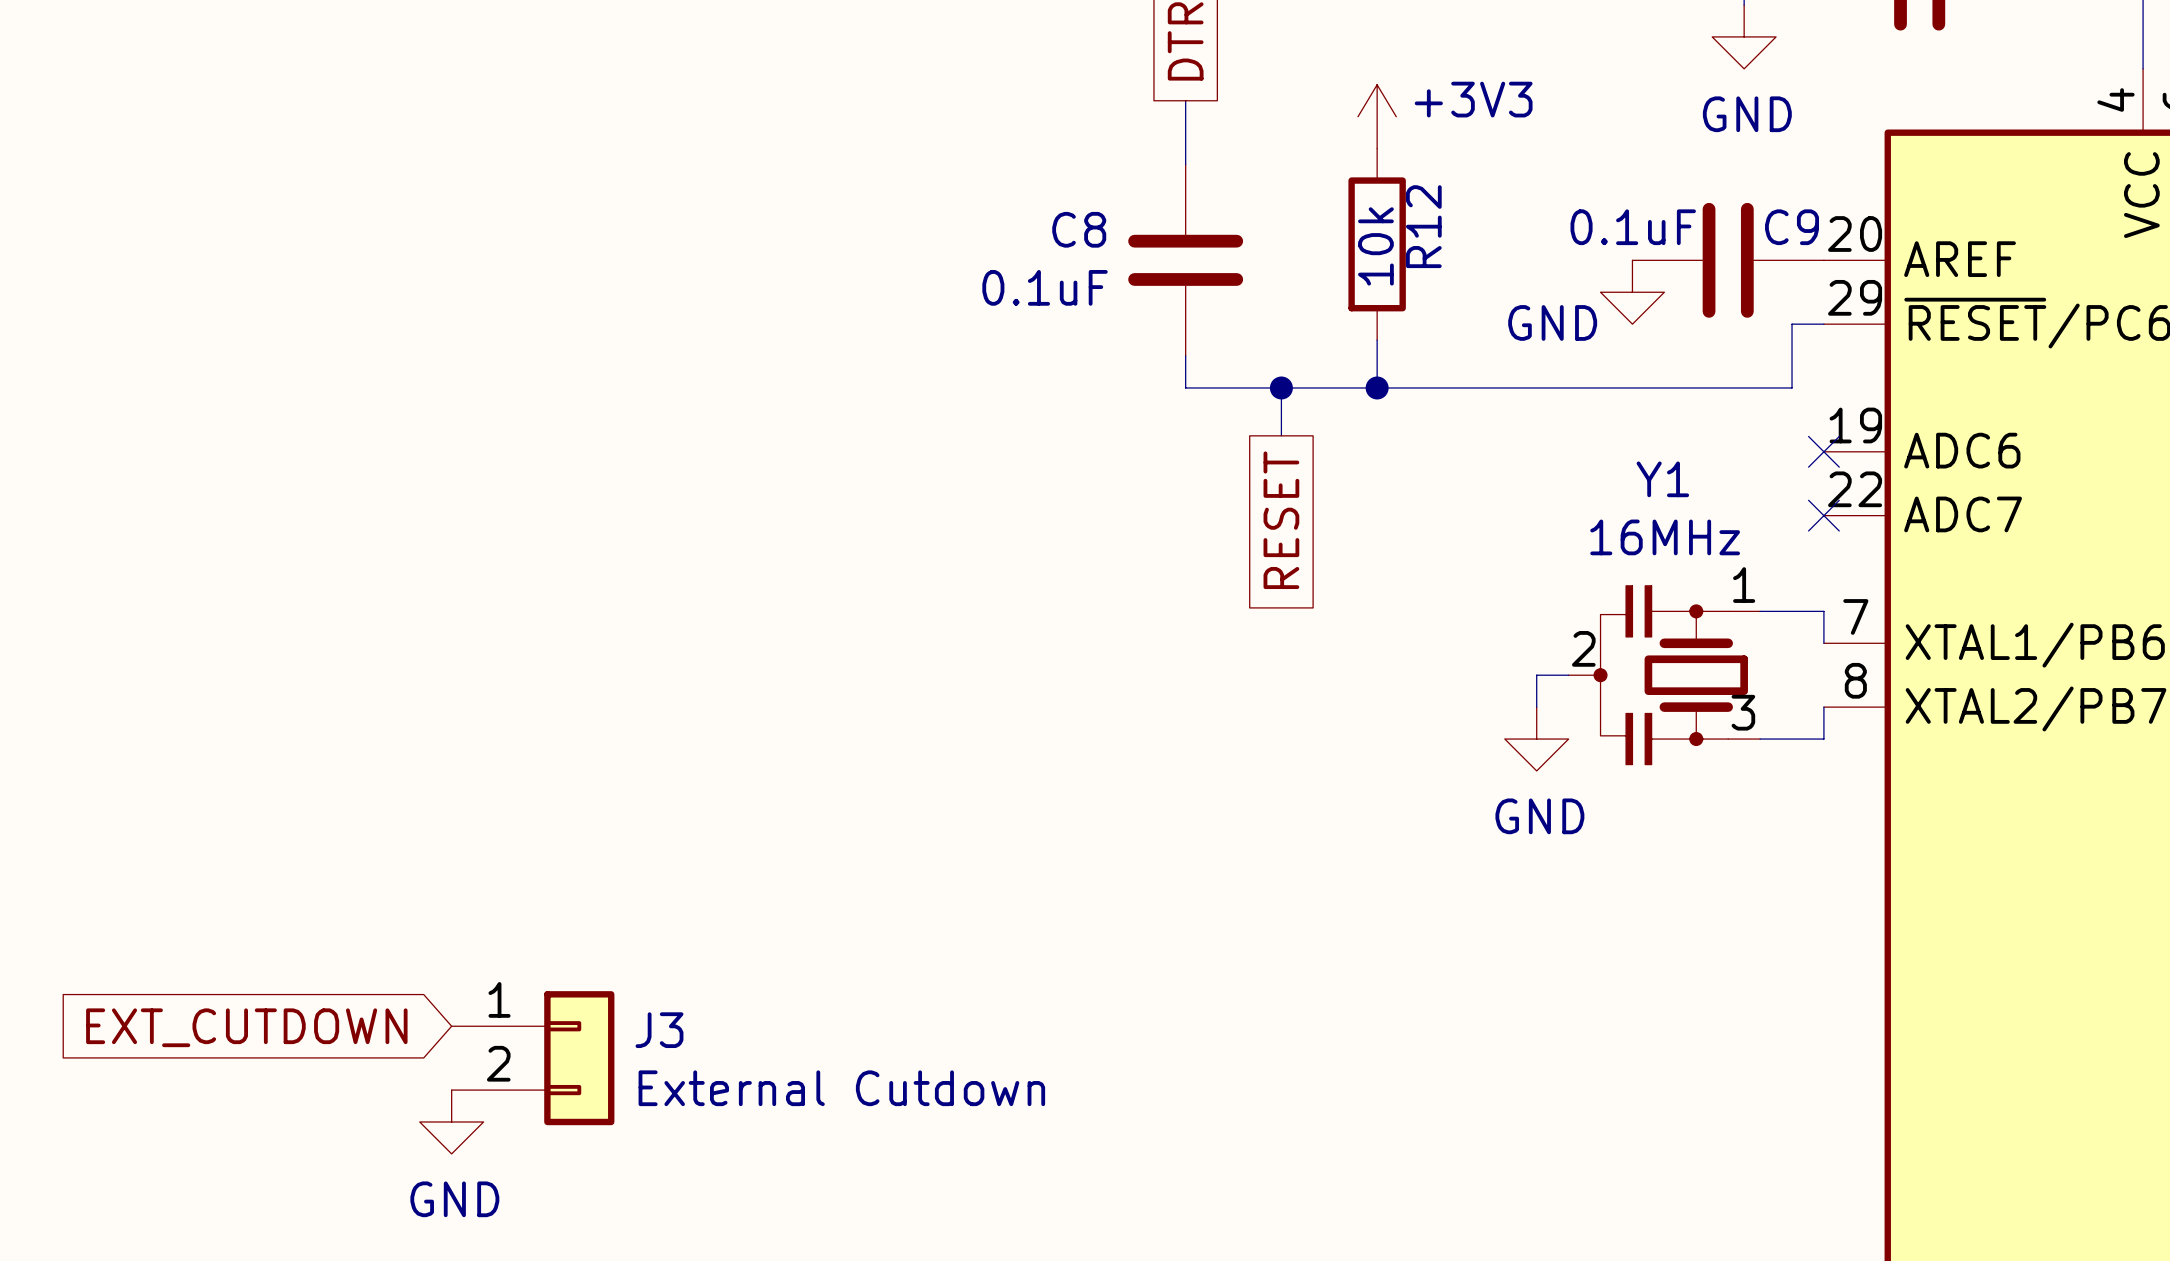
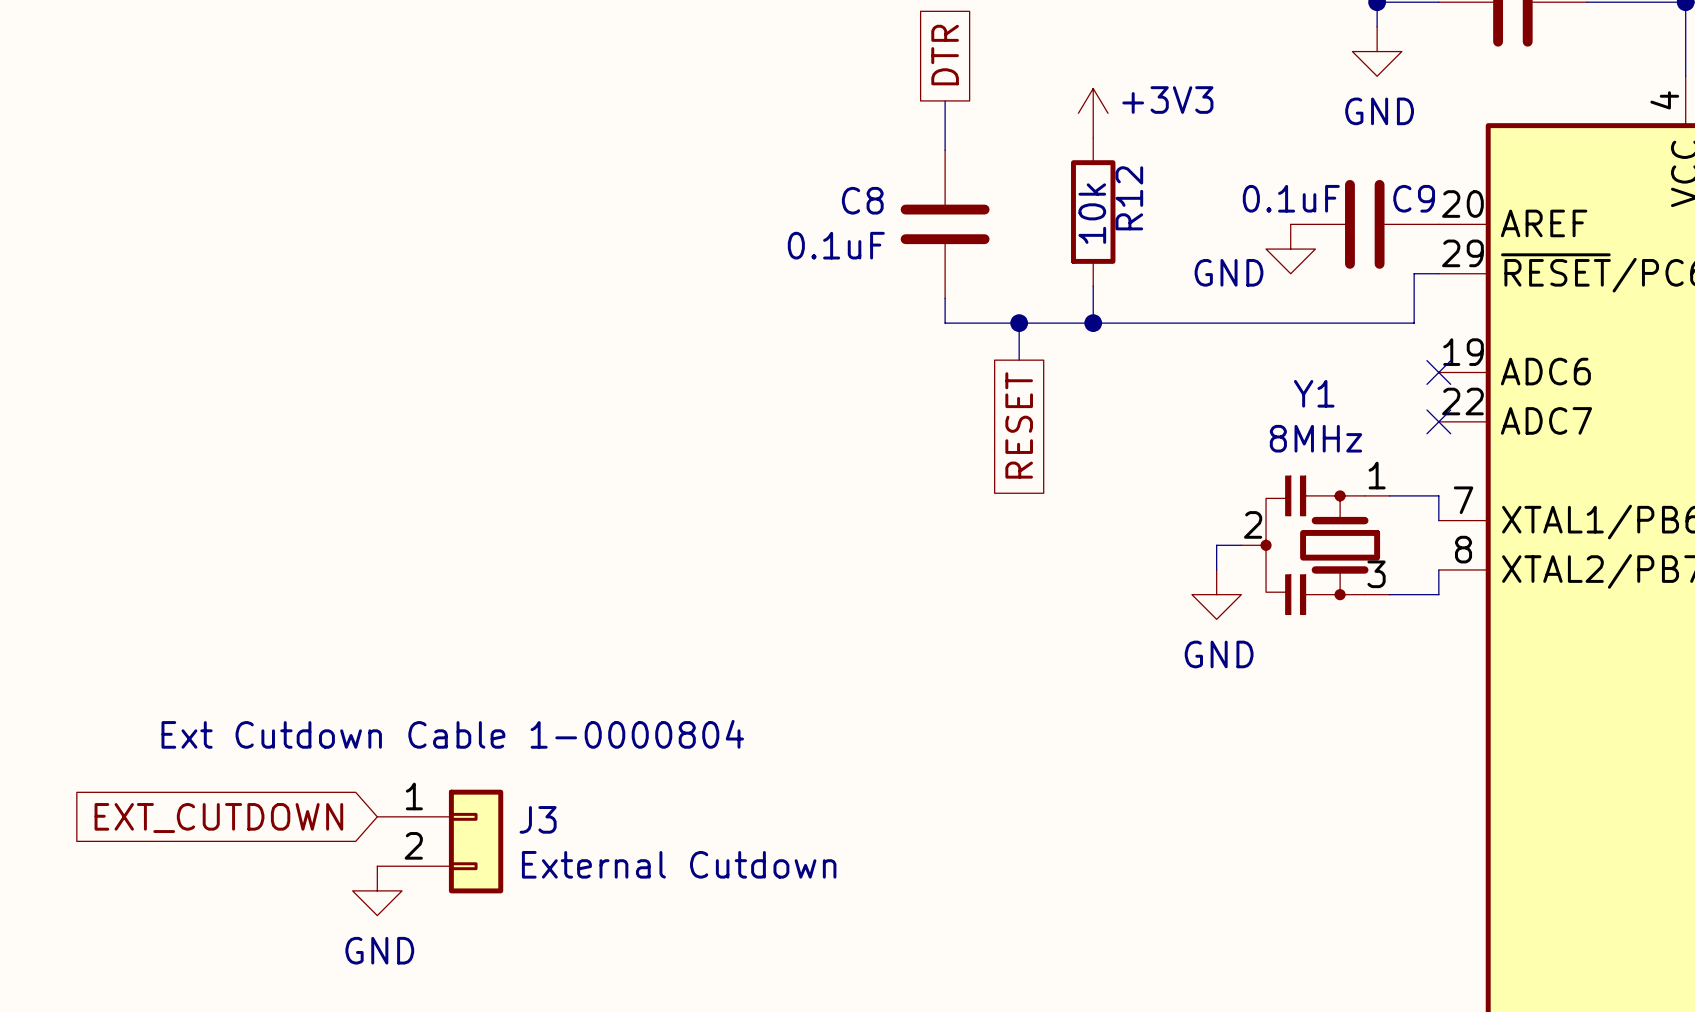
Y1 value: 16MHz (1665, 537) -> 8MHz (1315, 438)
text: none -> Ext Cutdown Cable 1-0000804 (452, 734)

